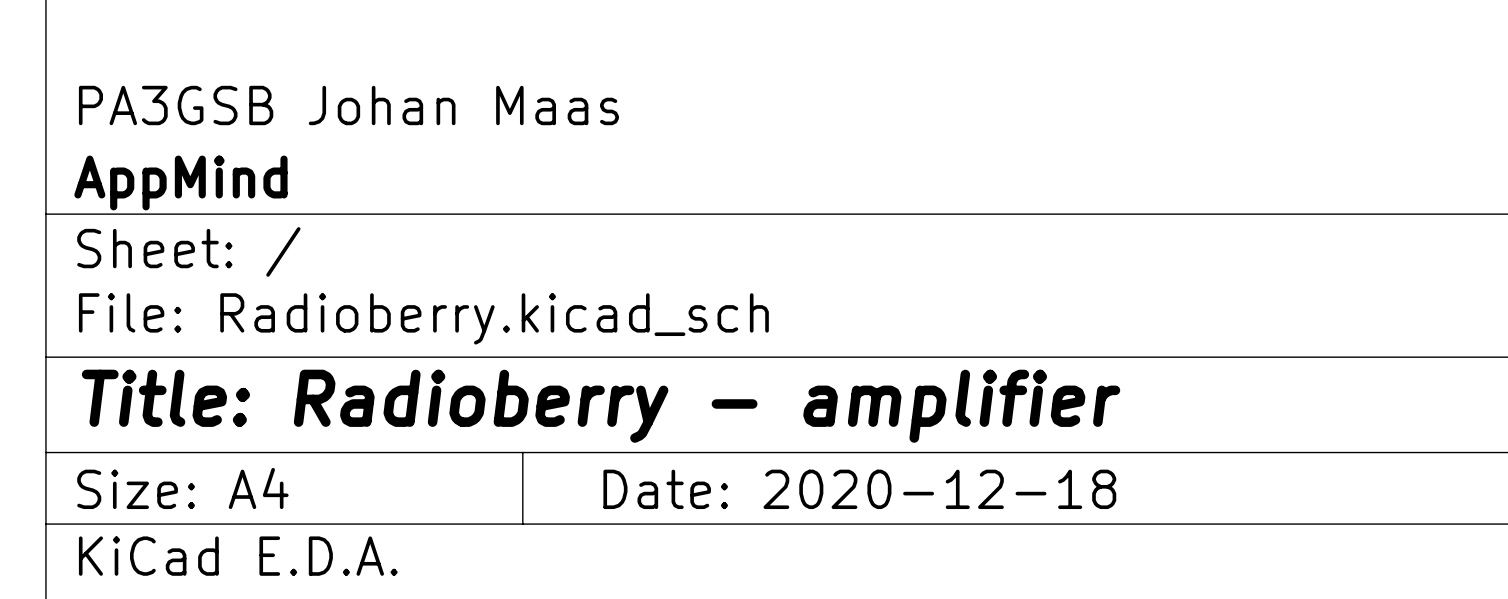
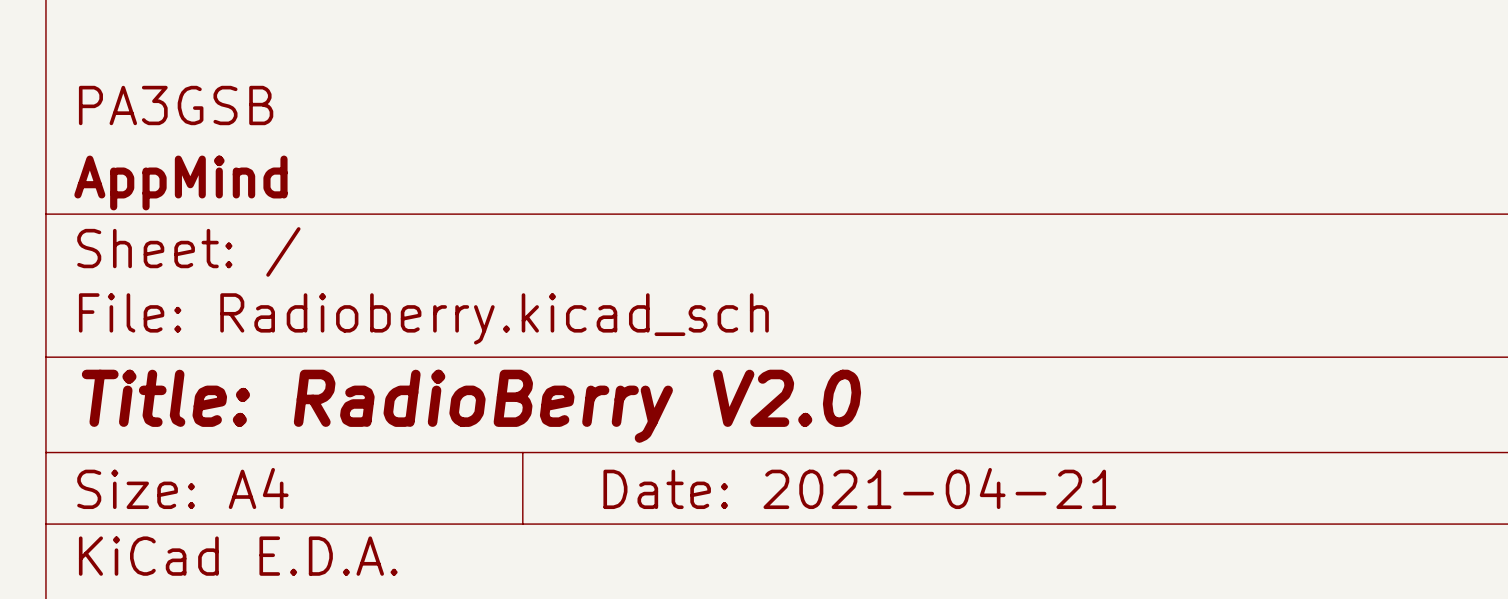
title block: PA3GSB Johan Maas (348, 105) -> PA3GSB (176, 105)
title block: Title: Radioberry - amplifier (601, 406) -> Title: RadioBerry V2.0 (471, 406)
title block: Date: 2020-12-18 (859, 489) -> Date: 2021-04-21 (859, 488)

